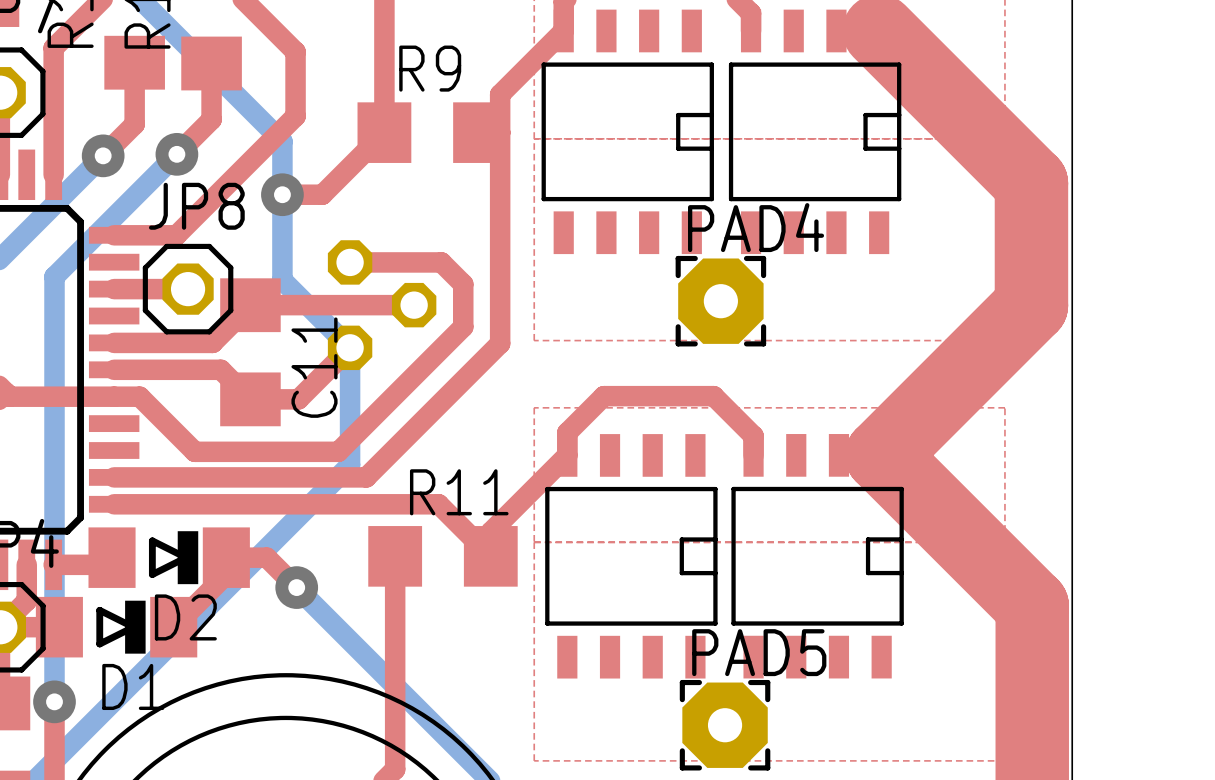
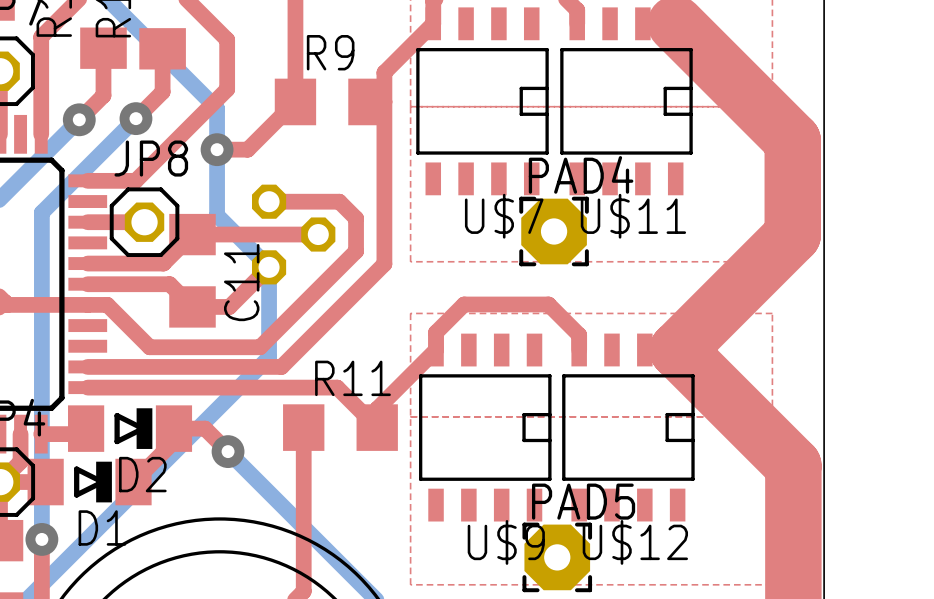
U$7 name: none -> U$7 (504, 216)
U$11 name: none -> U$11 (633, 216)
U$9 name: none -> U$9 (506, 542)
U$12 name: none -> U$12 (635, 542)

